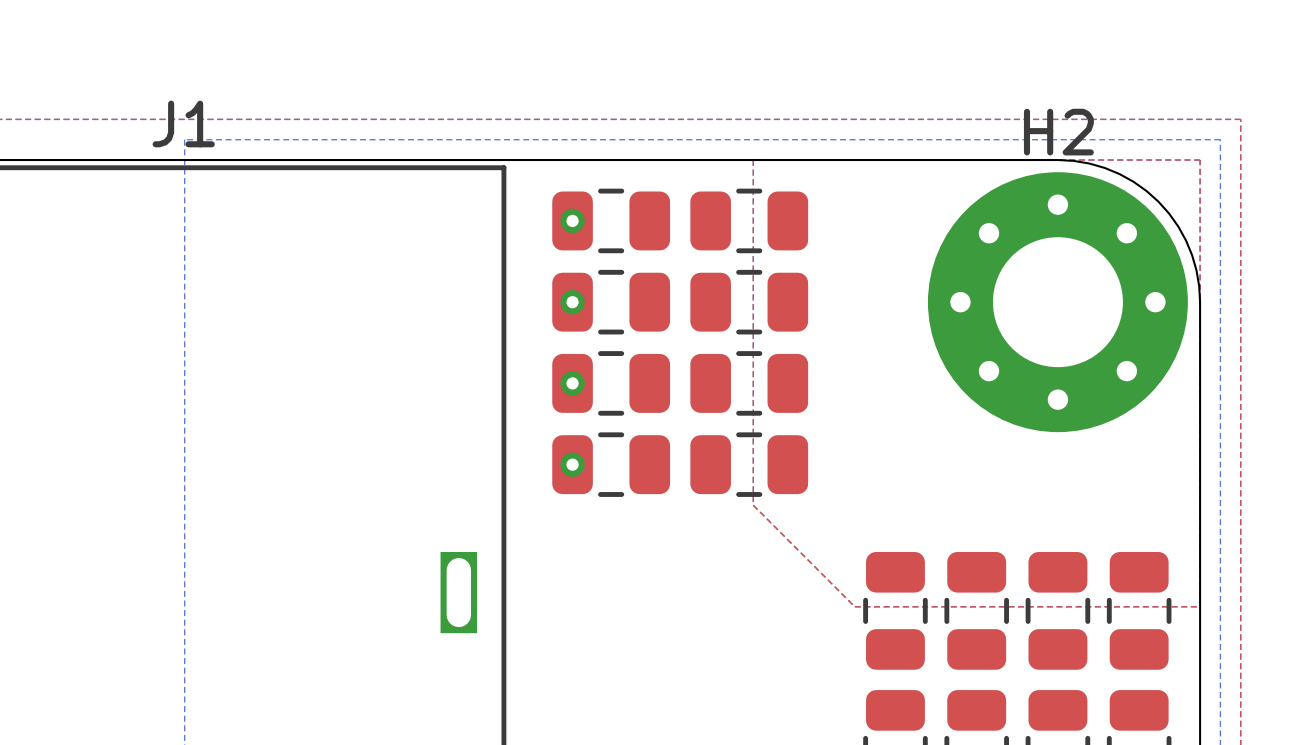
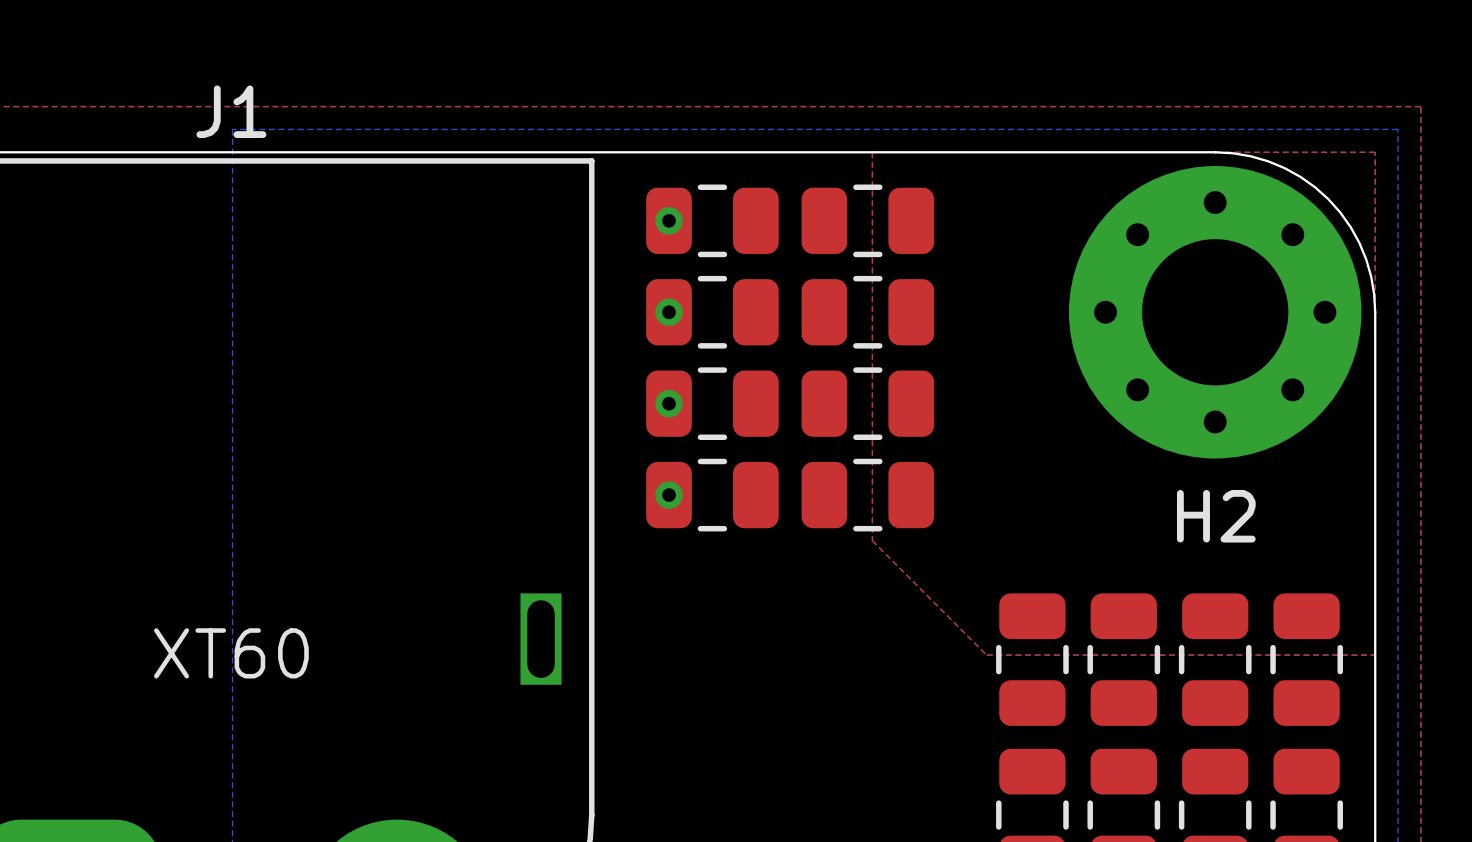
H2 name position: H2 (1058, 132) -> H2 (1216, 516)
text: none -> XT60 (231, 653)

